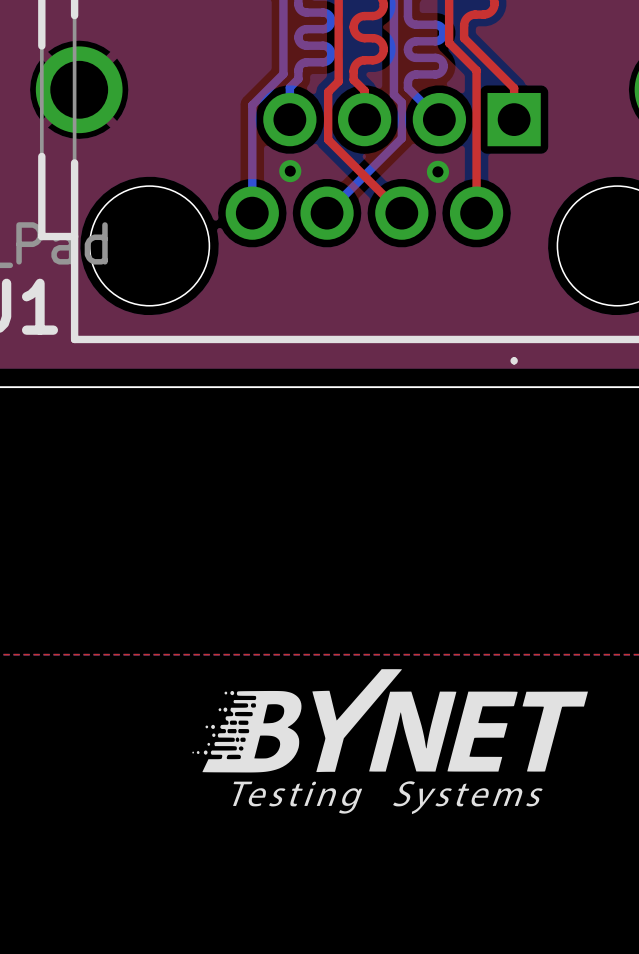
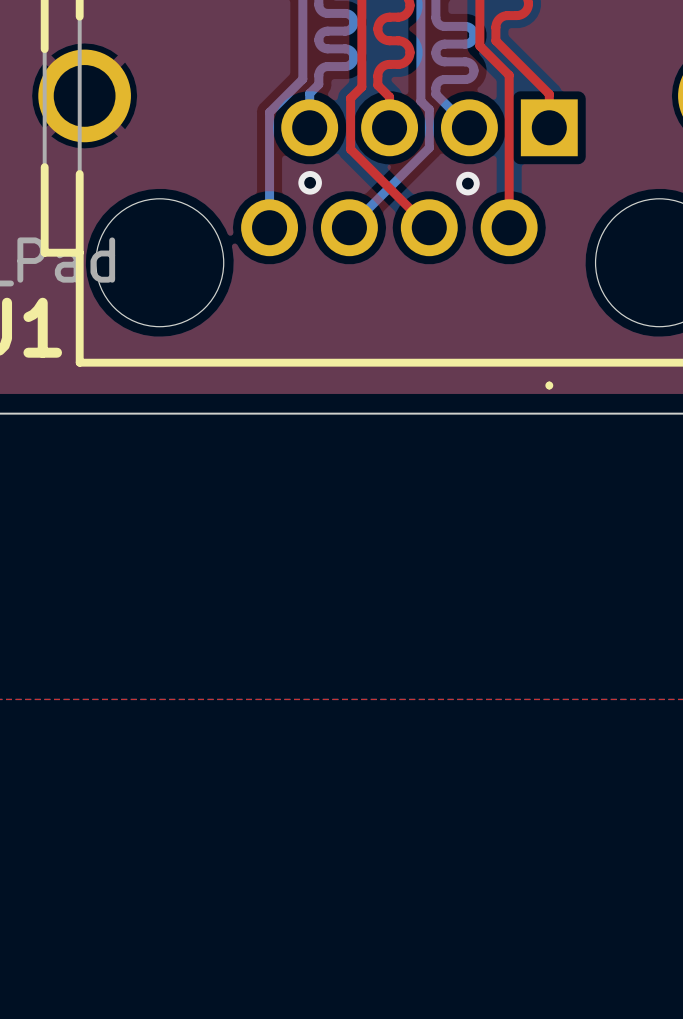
drawing: [192, 669, 588, 815] -> none

